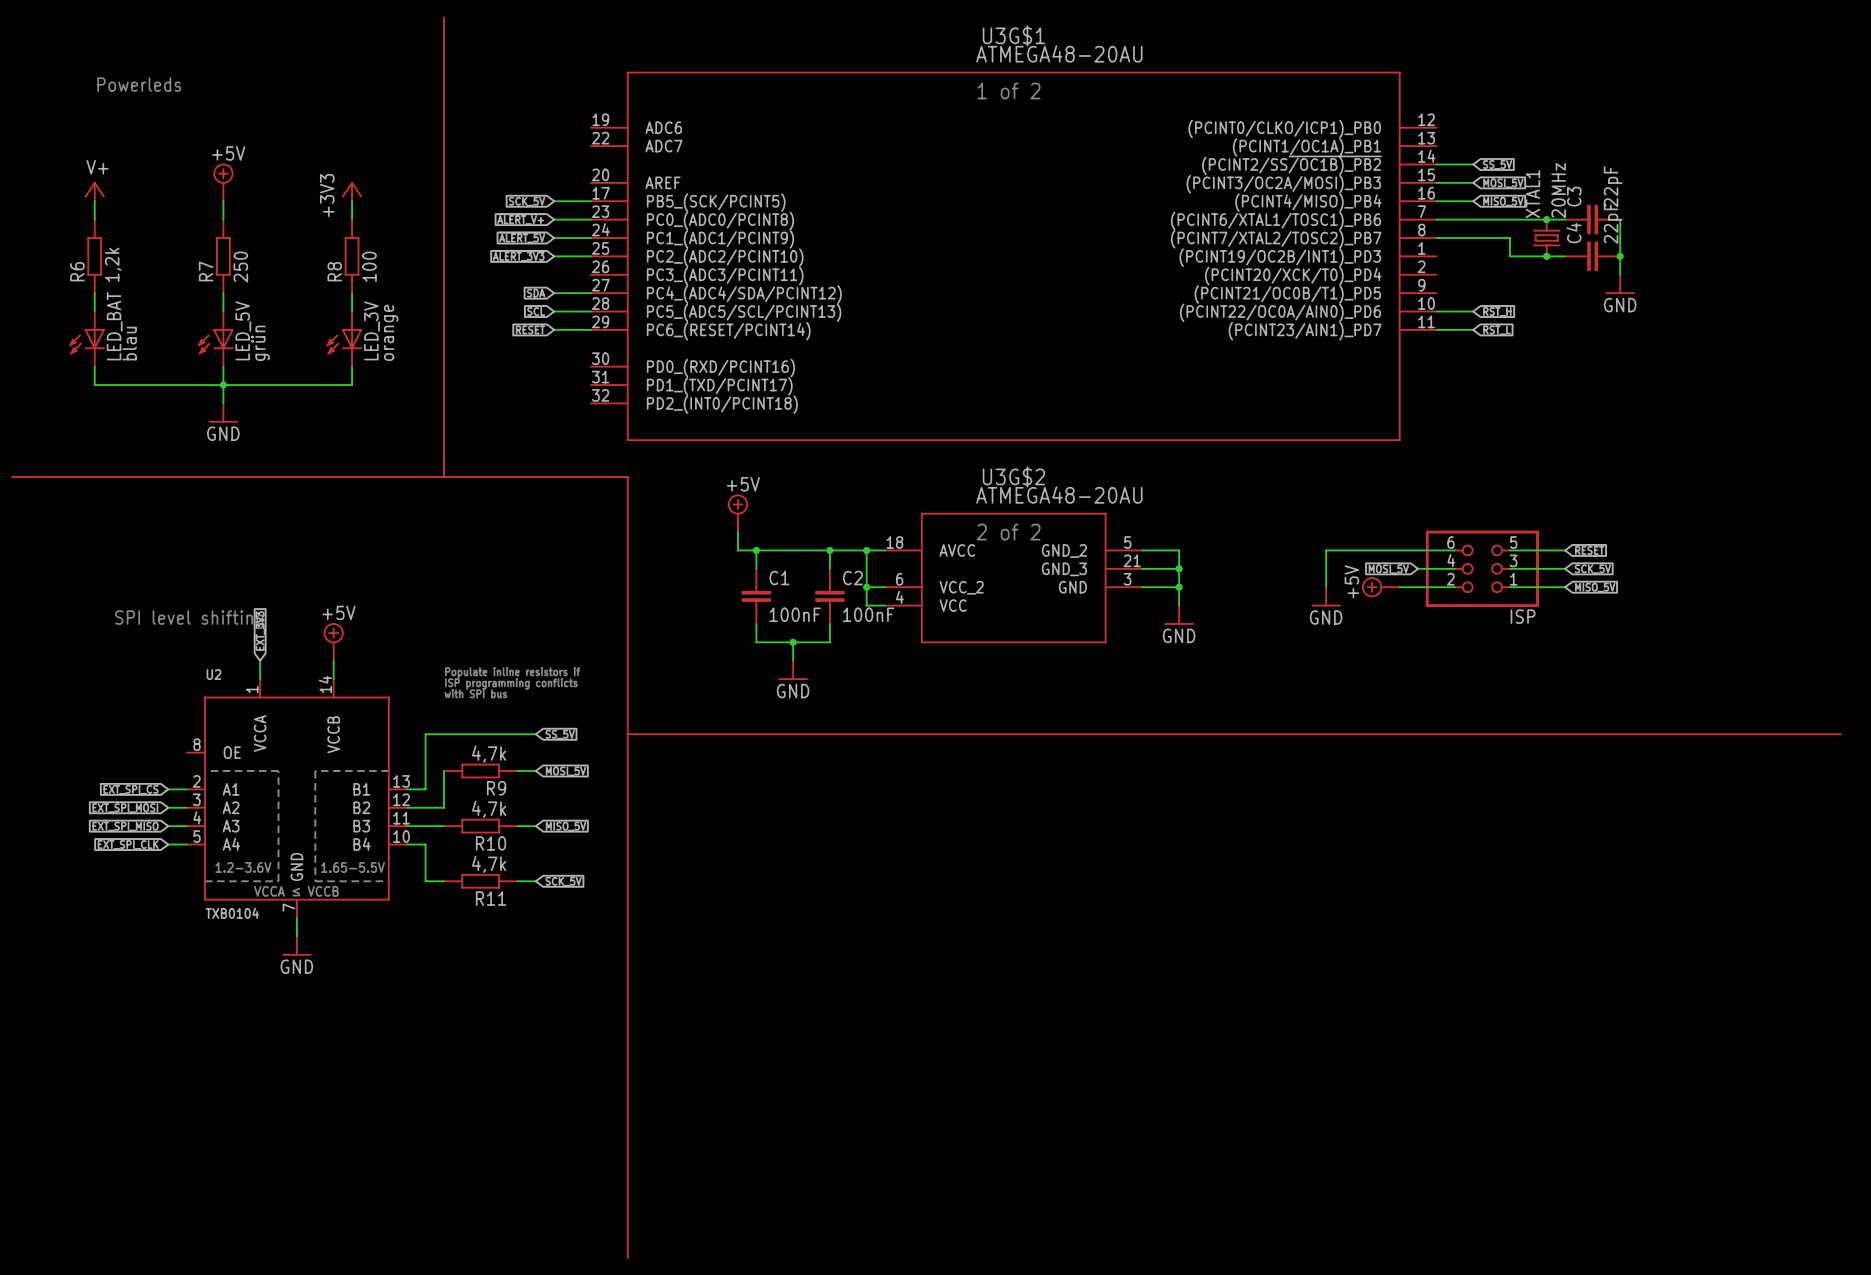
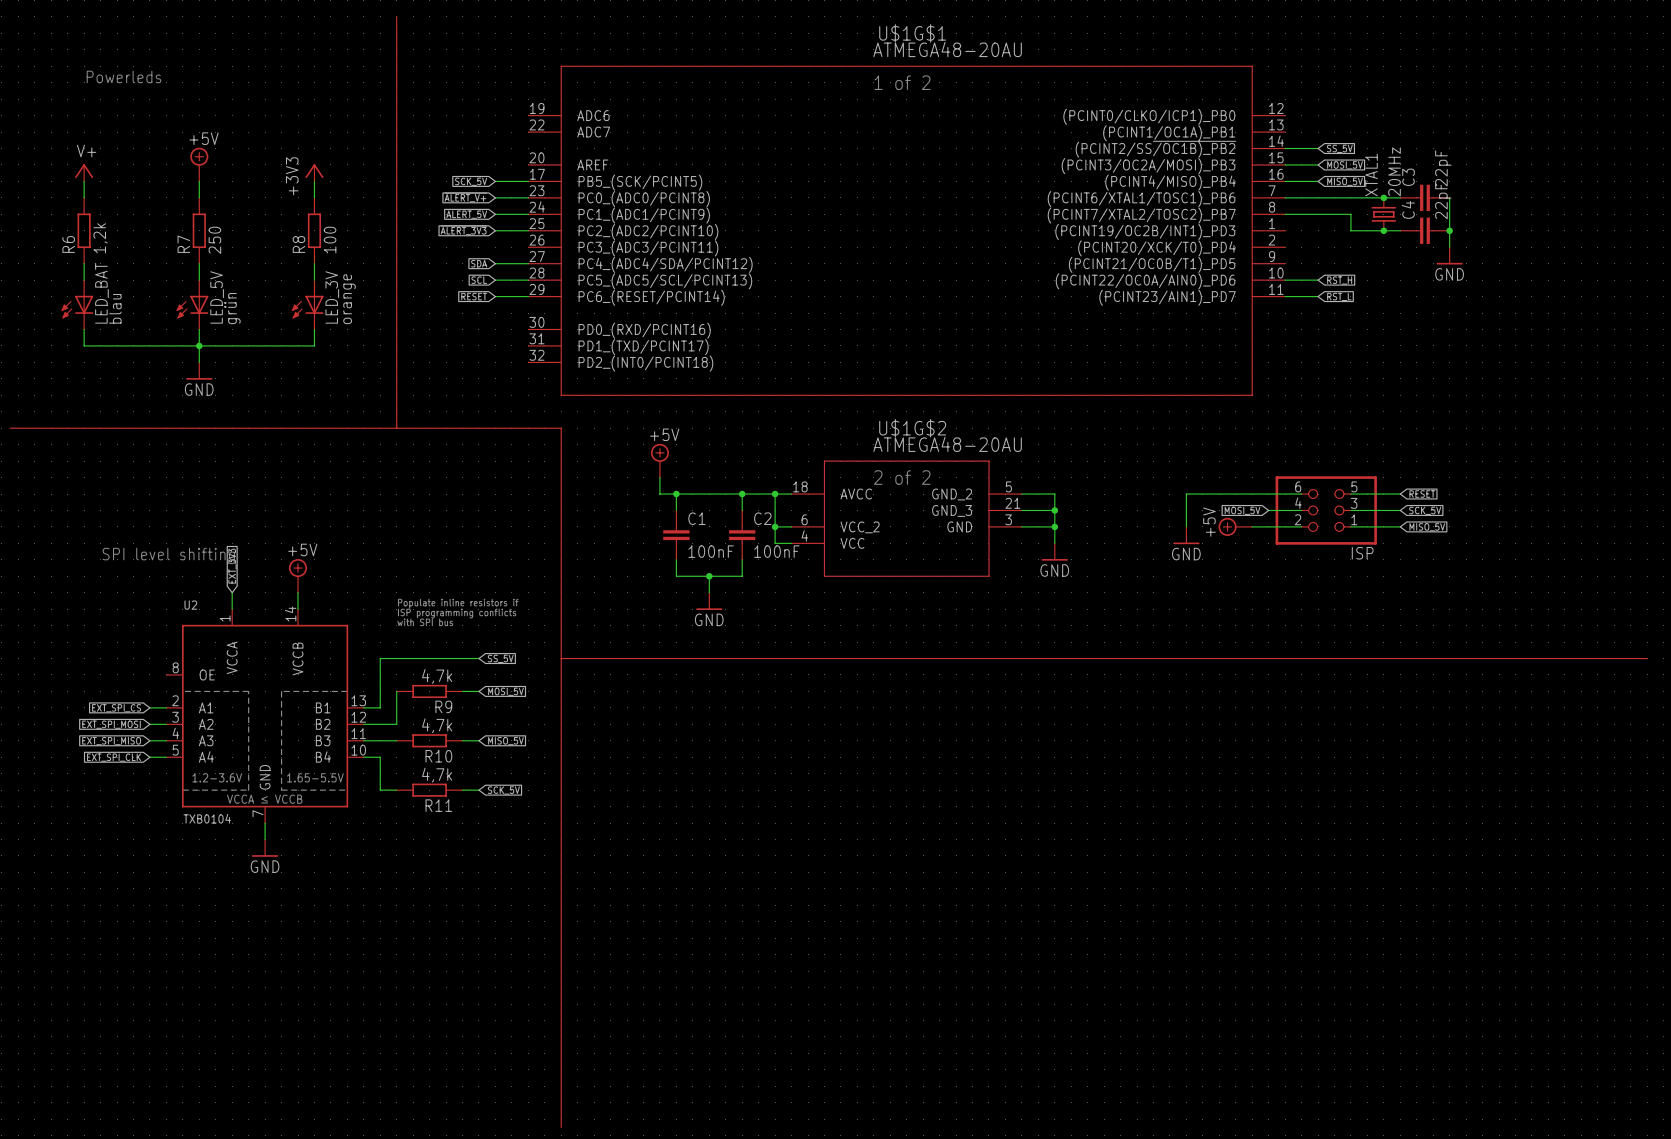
U3G$1 name: U3G$1 (1013, 35) -> U$1G$1 (912, 33)
U3G$2 name: U3G$2 (1013, 476) -> U$1G$2 (912, 428)

